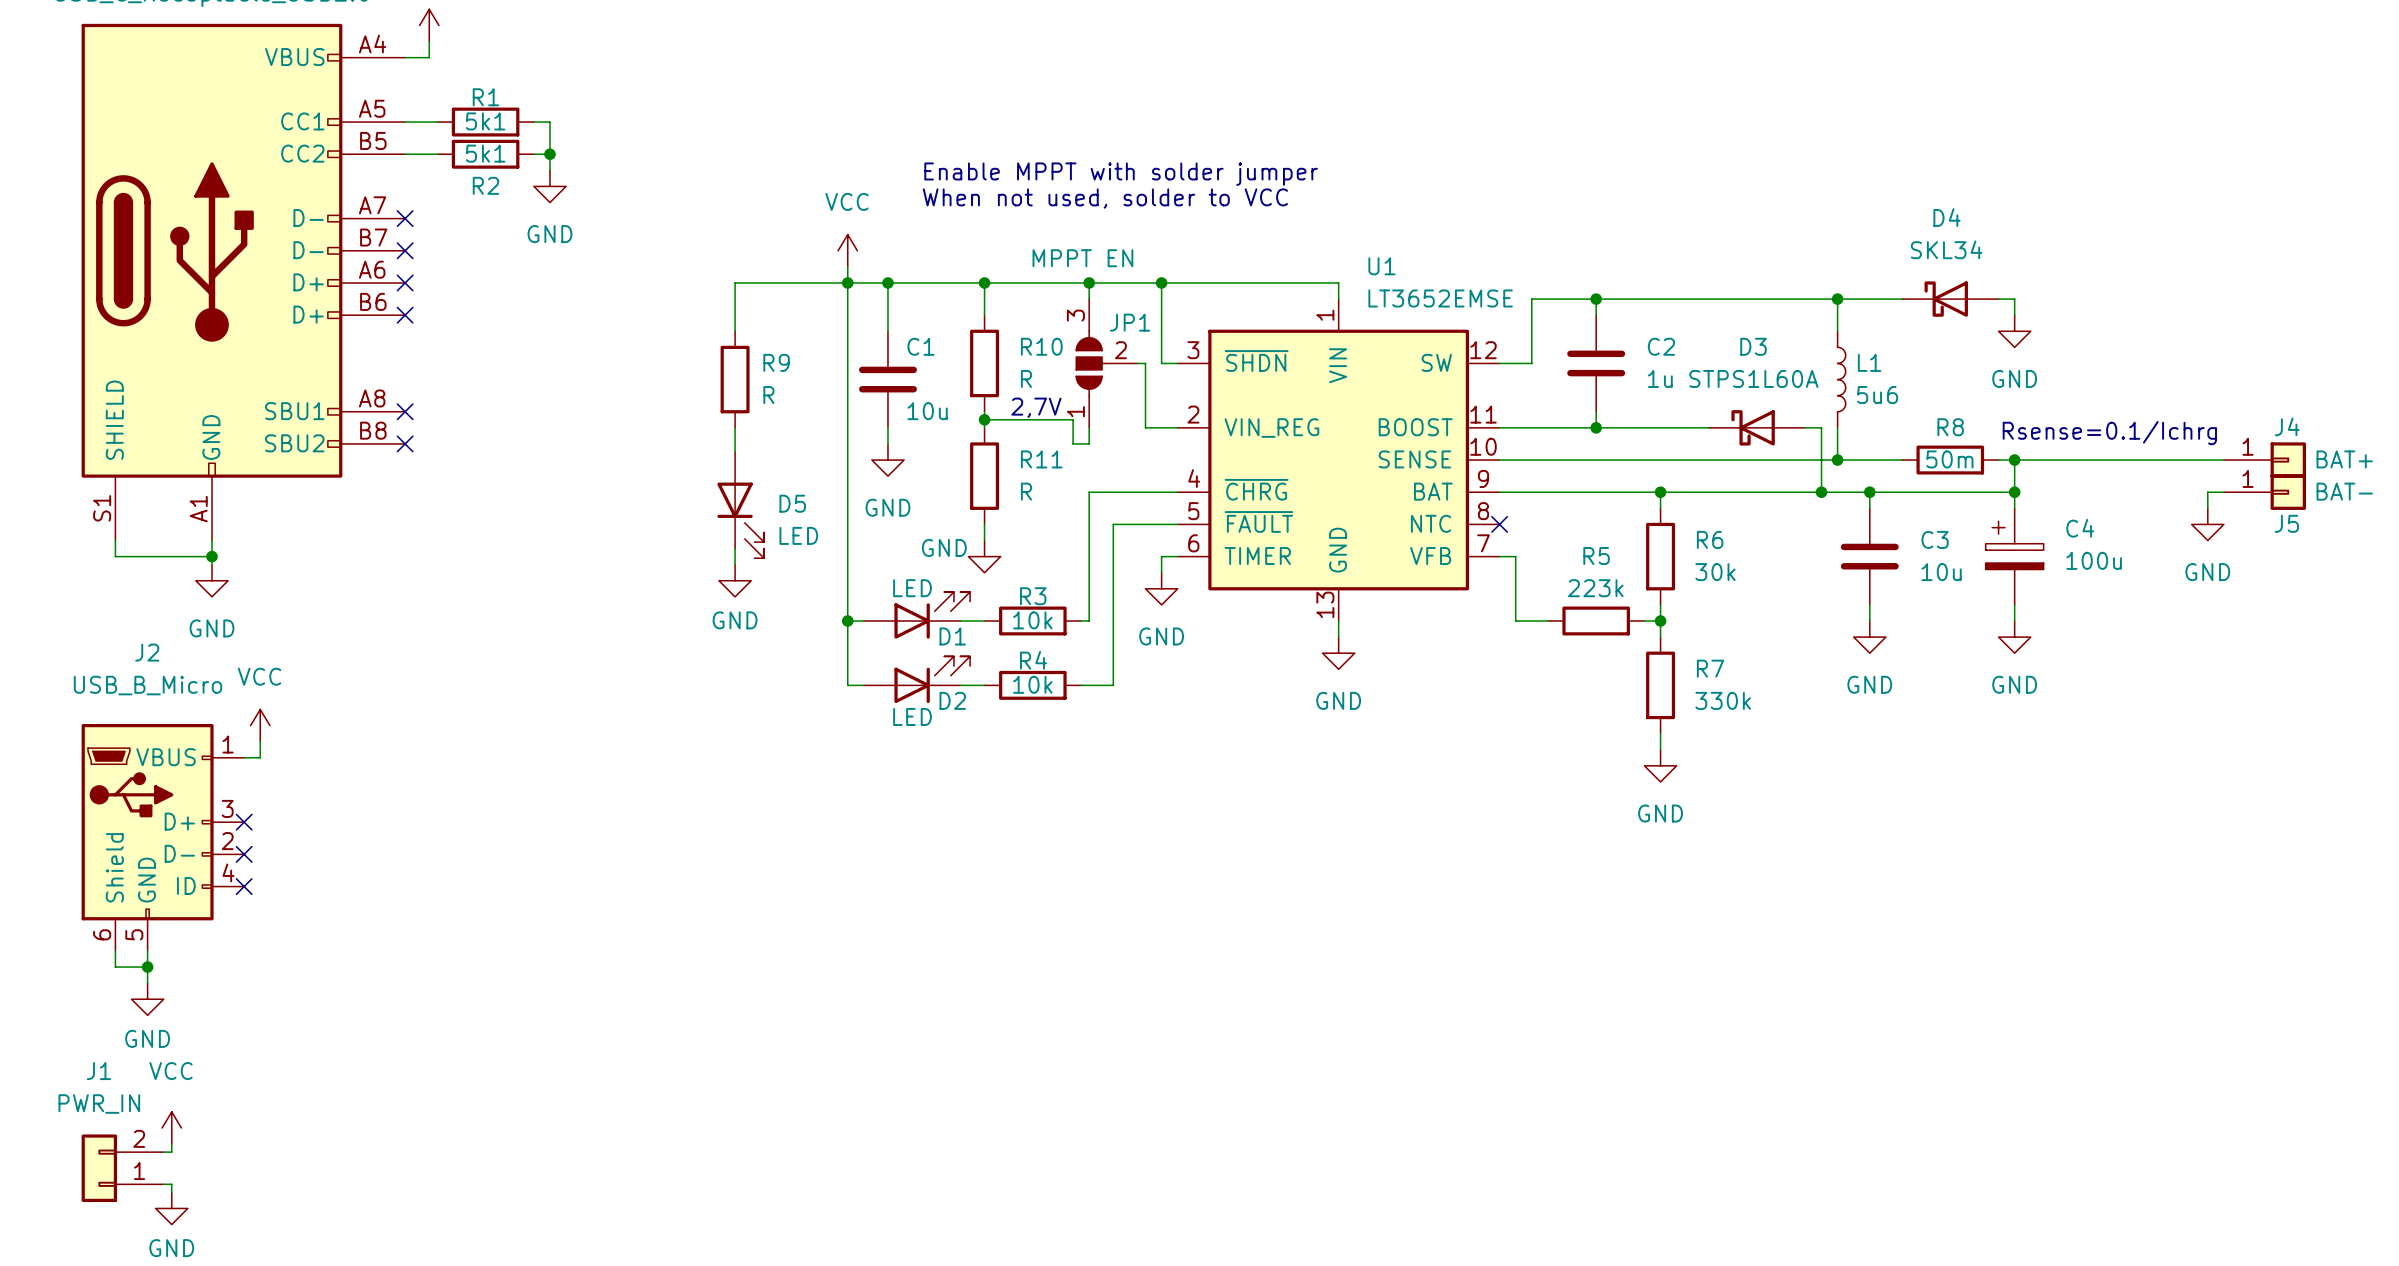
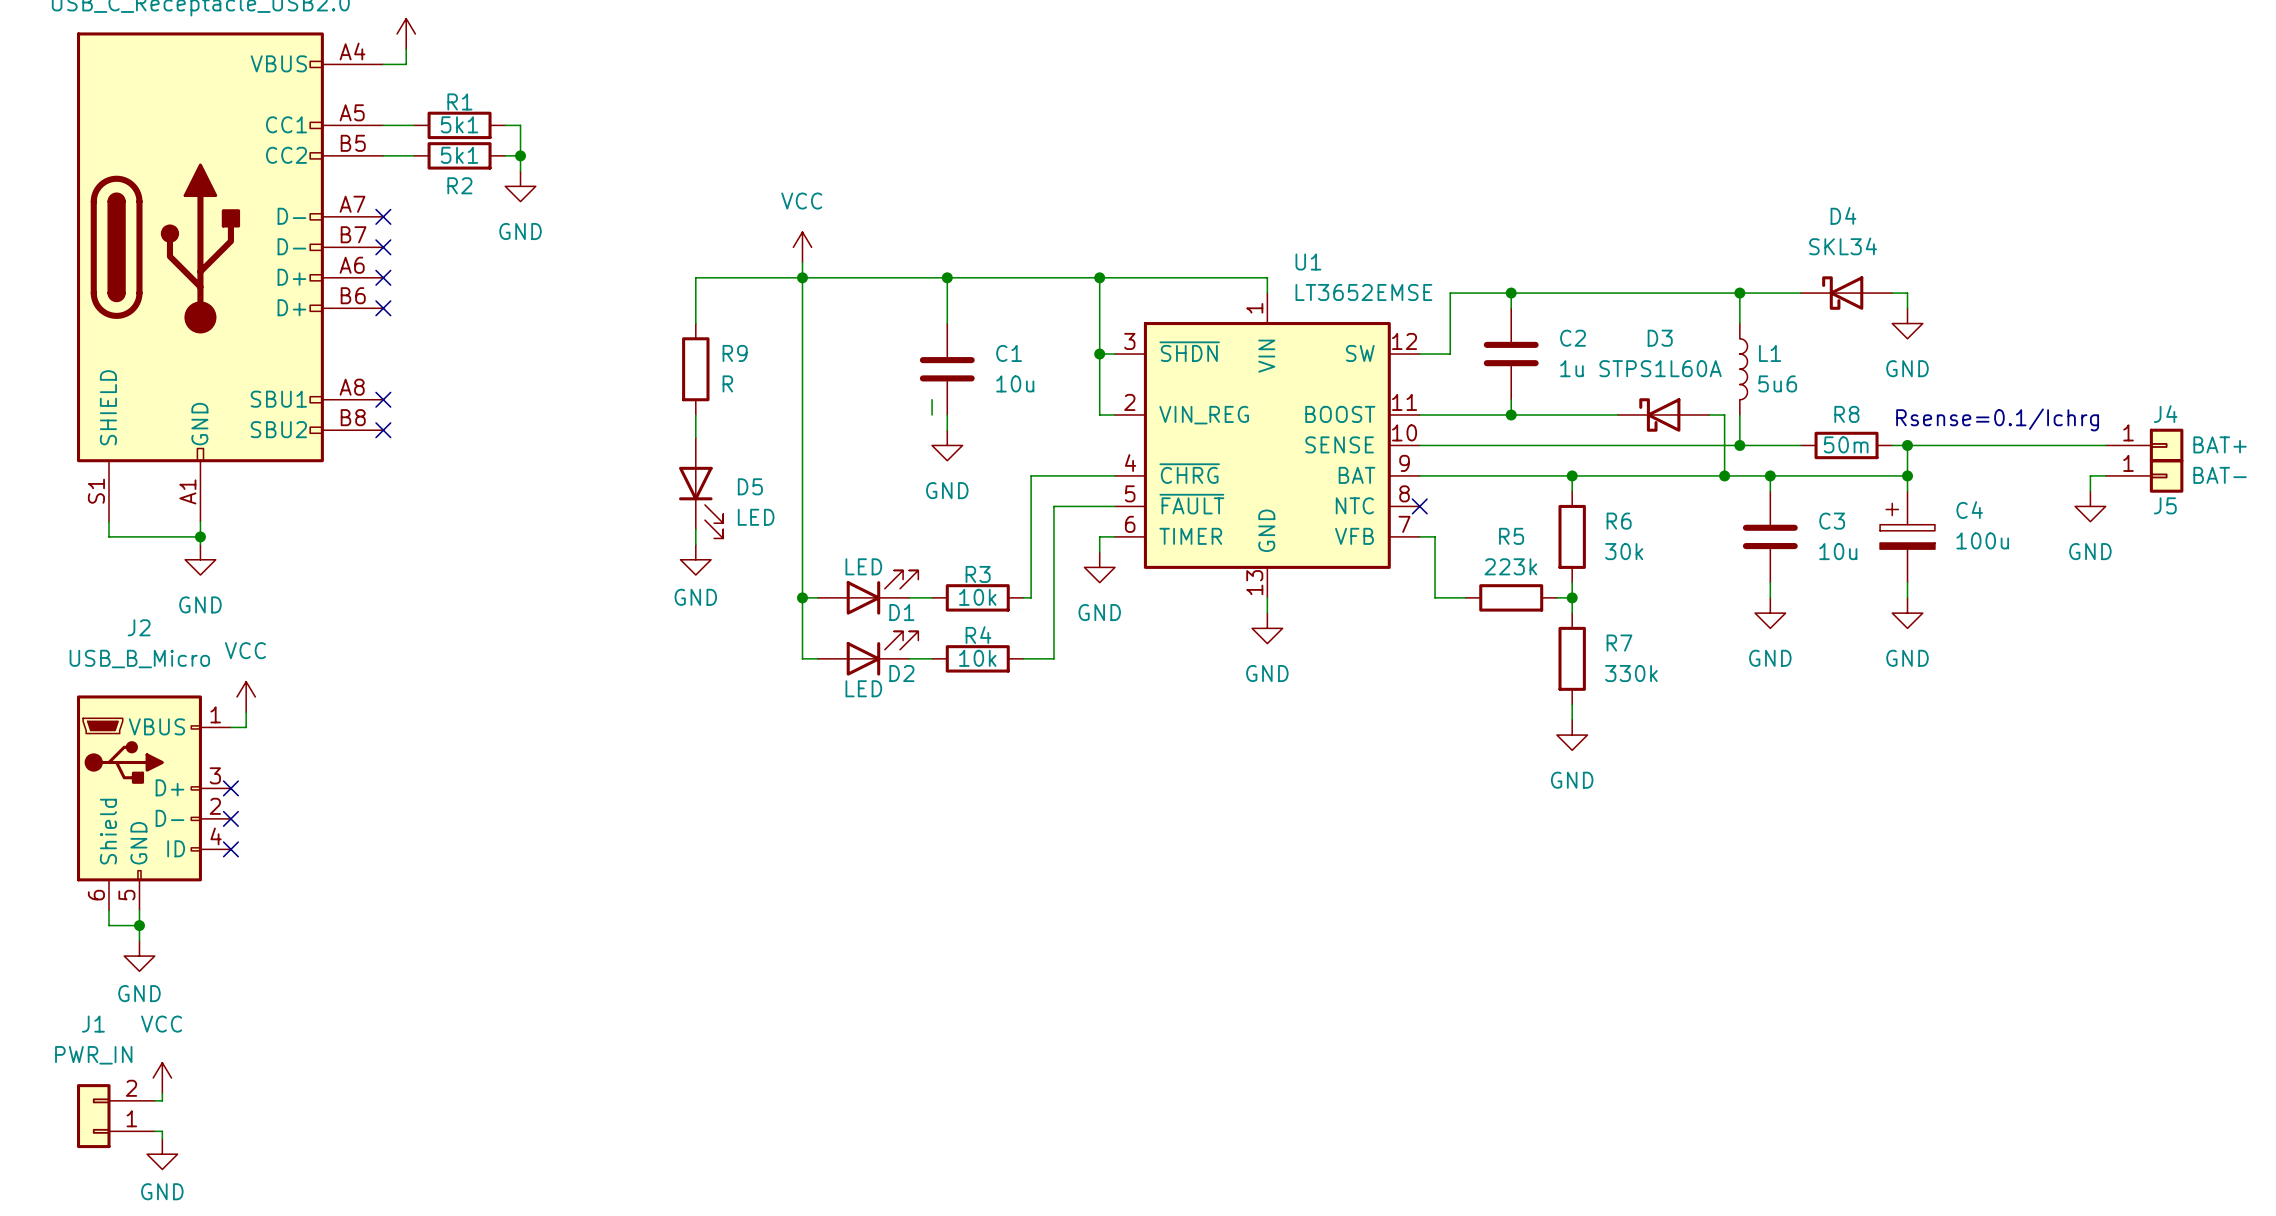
text: Enable MPPT with solder jumper (1121, 174) -> none
text: When not used, solder to VCC (1105, 198) -> none
wire: (887, 282) (887, 331) -> (947, 277) (947, 323)
junction: (887, 282) -> none
wire: (984, 282) (984, 315) -> none
junction position: (984, 282) -> (947, 277)
wire: (1089, 282) (1089, 299) -> none
junction: (1089, 282) -> none
C1 name position: C1 (921, 346) -> C1 (1009, 353)
R10: R (984, 363) -> none
JP1: MPPT EN (1106, 363) -> none
wire: (1137, 363) (1145, 363) (1145, 427) (1161, 427) -> (1099, 354) (1099, 414)
junction: none -> (1099, 354)
C1 position: (887, 379) -> (947, 369)
text: 2,7V (1036, 407) -> none
C1 value position: 10u (927, 411) -> 10u (1015, 383)
wire: (984, 419) (1073, 419) (1073, 443) (1089, 443) (1089, 427) -> none
junction: (984, 419) -> none
wire: (887, 427) (887, 443) -> (947, 414) (947, 430)
power symbol: GND (887, 460) -> none
power symbol: none -> GND (947, 445)
R11: R (984, 476) -> none
wire: (984, 524) (984, 540) -> none
power symbol: GND (984, 556) -> none

